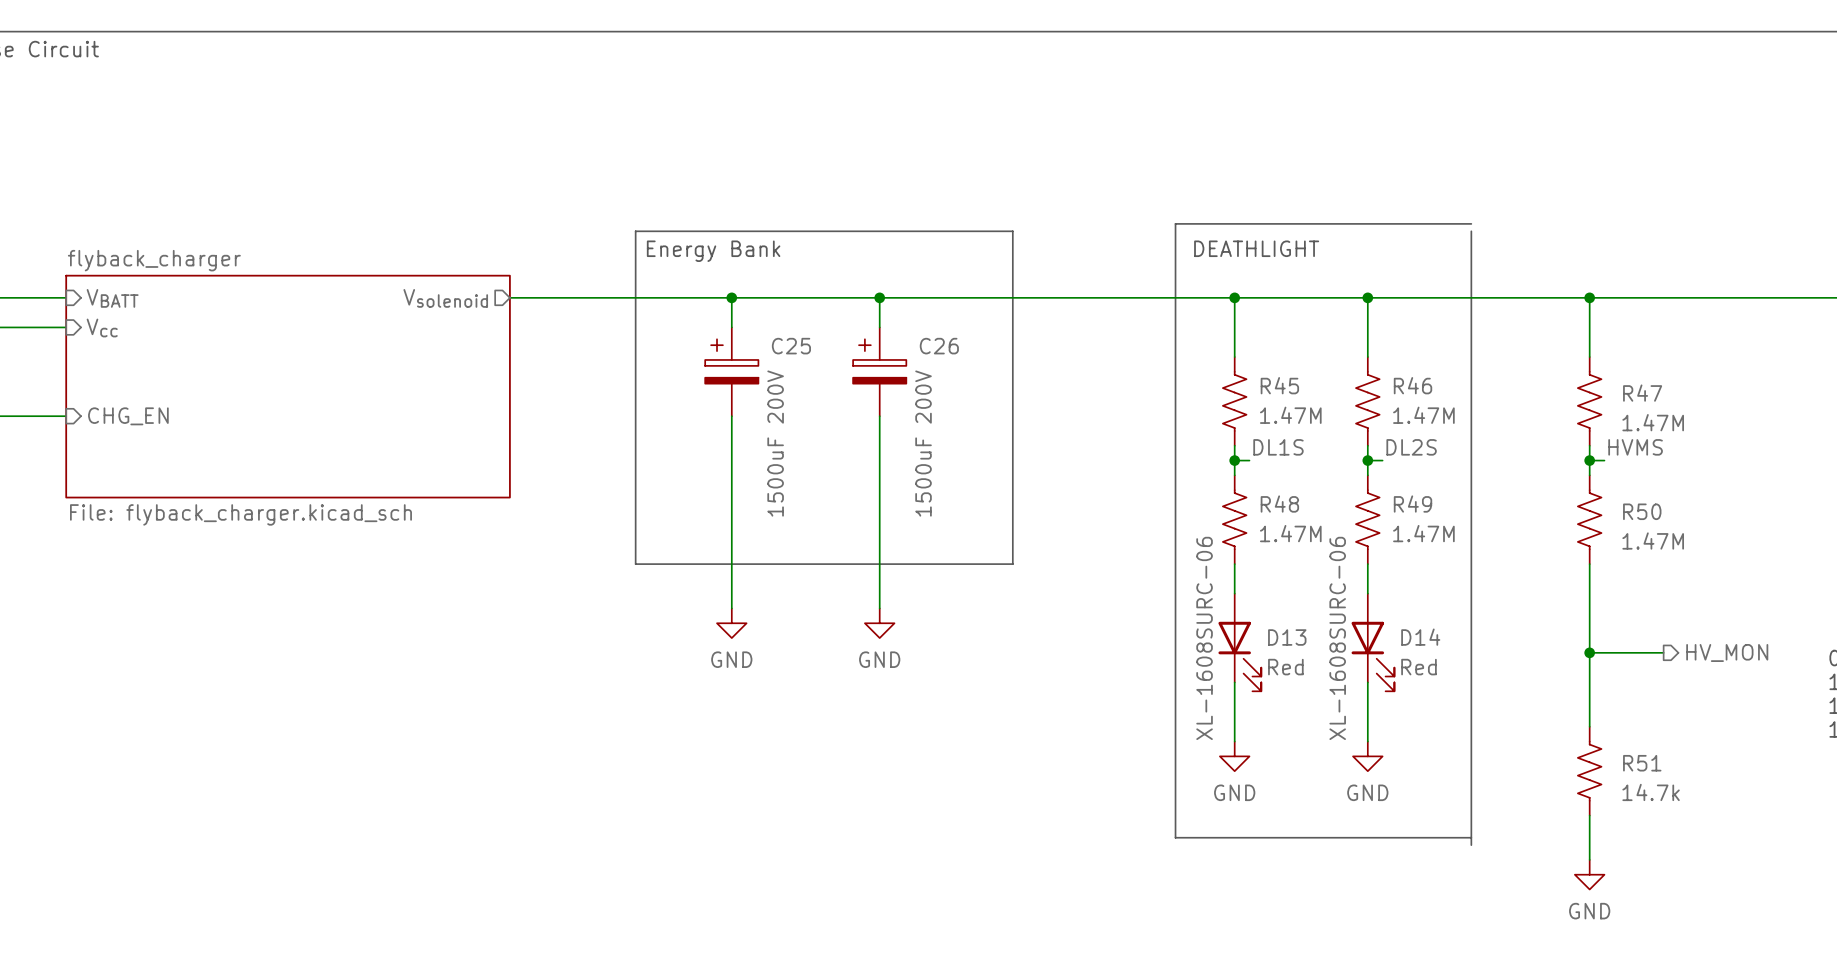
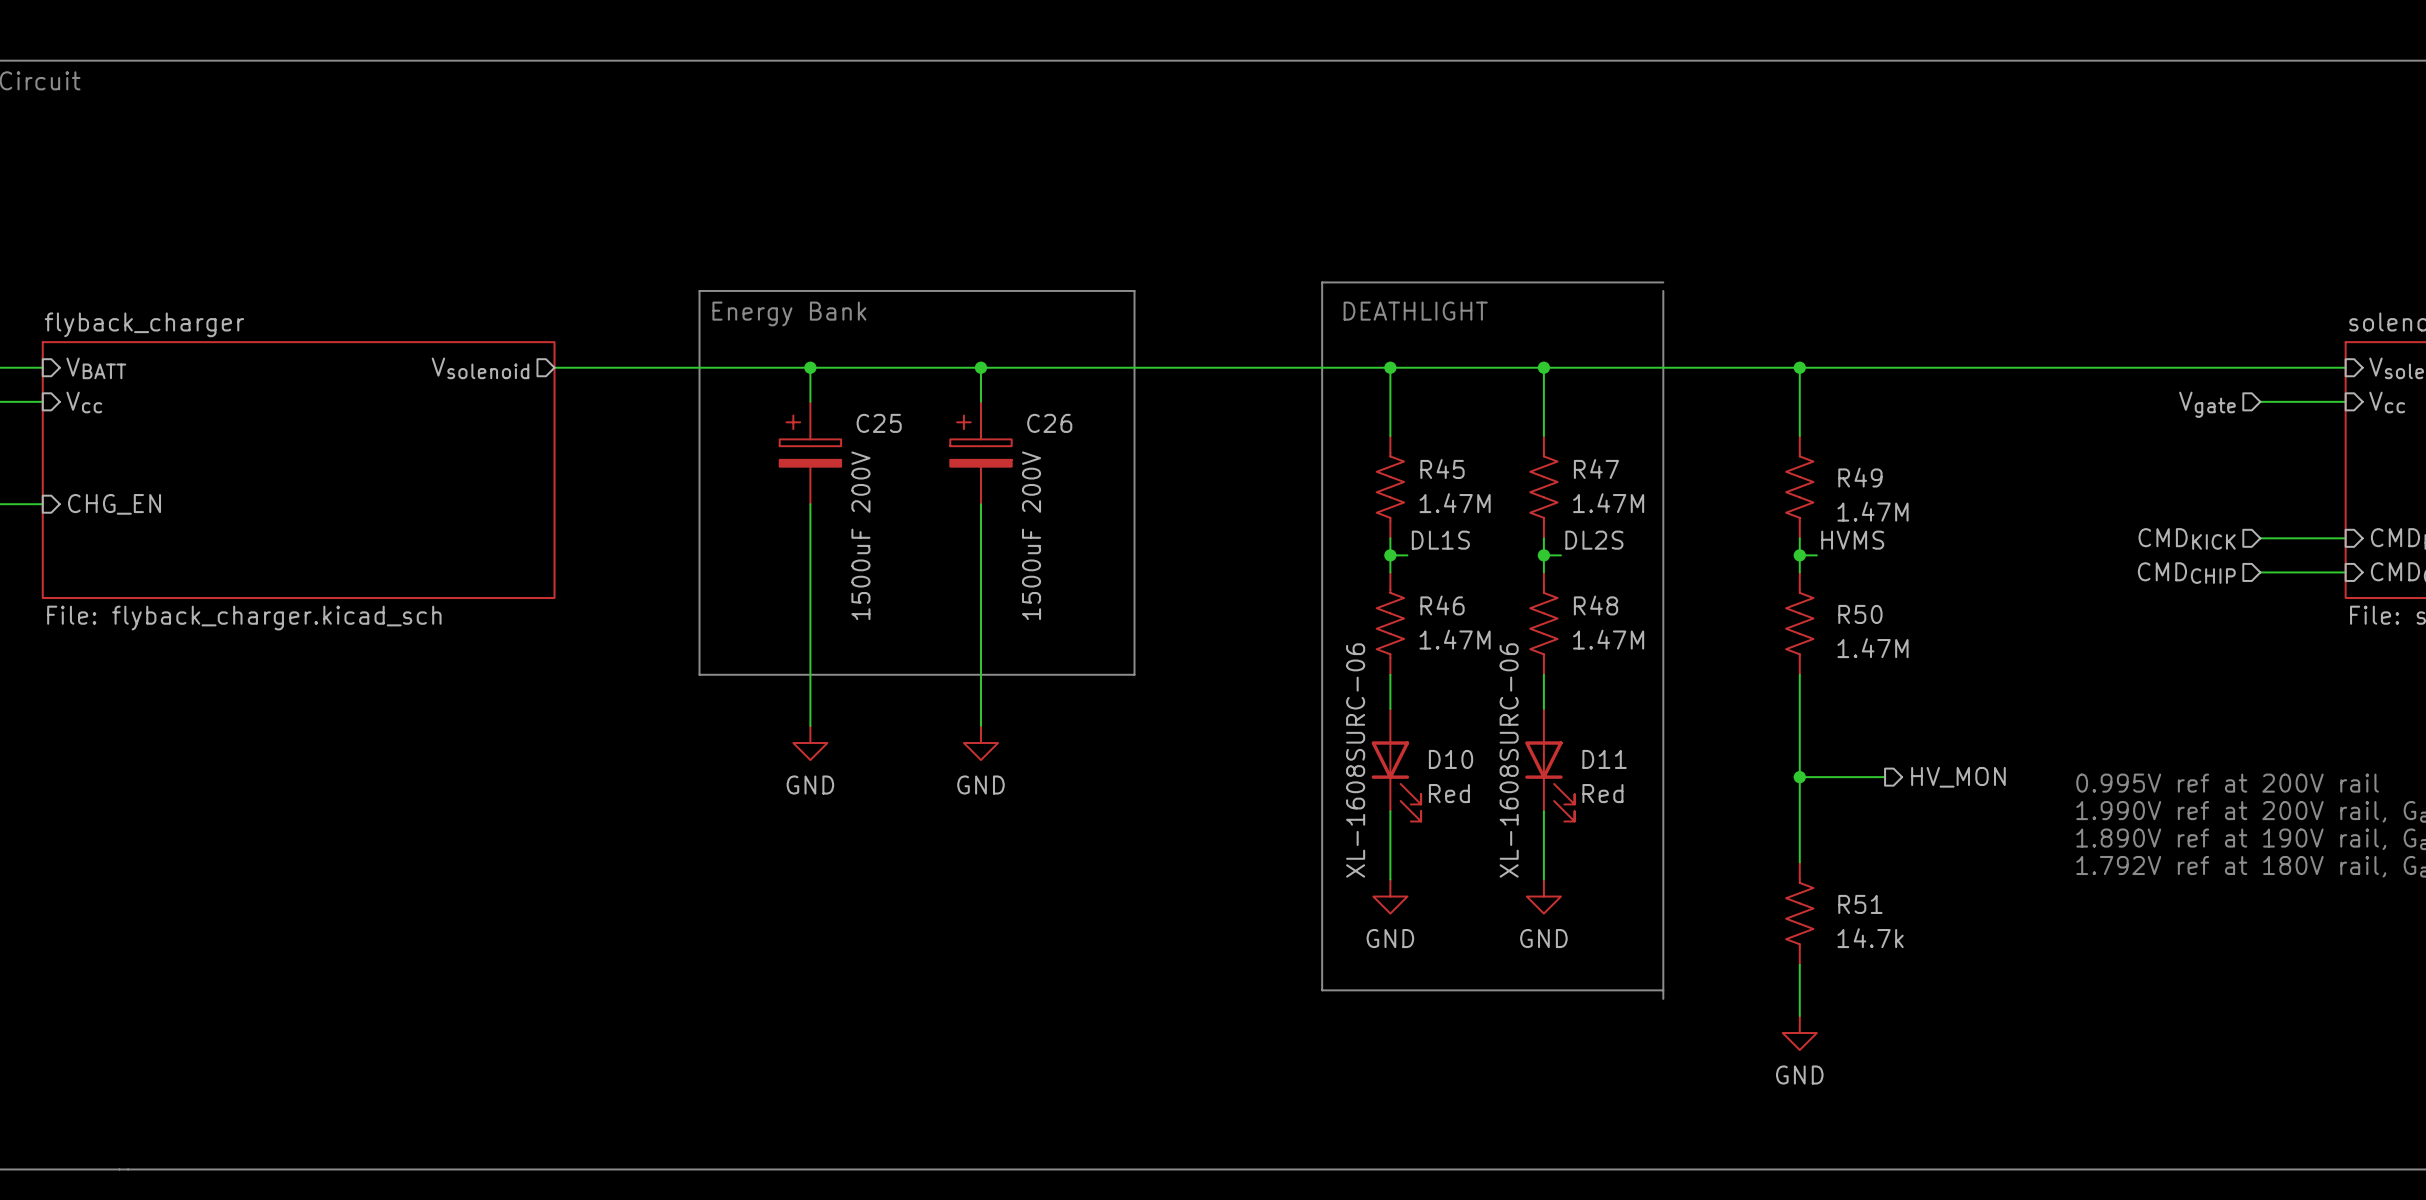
R46 name: R46 (1413, 385) -> R47 (1596, 469)
R47 name: R47 (1642, 393) -> R49 (1860, 477)
R48 name: R48 (1279, 504) -> R46 (1442, 605)
R49 name: R49 (1413, 504) -> R48 (1596, 605)
D13 name: D13 (1287, 637) -> D10 (1451, 759)
D14 name: D14 (1420, 637) -> D11 (1604, 759)

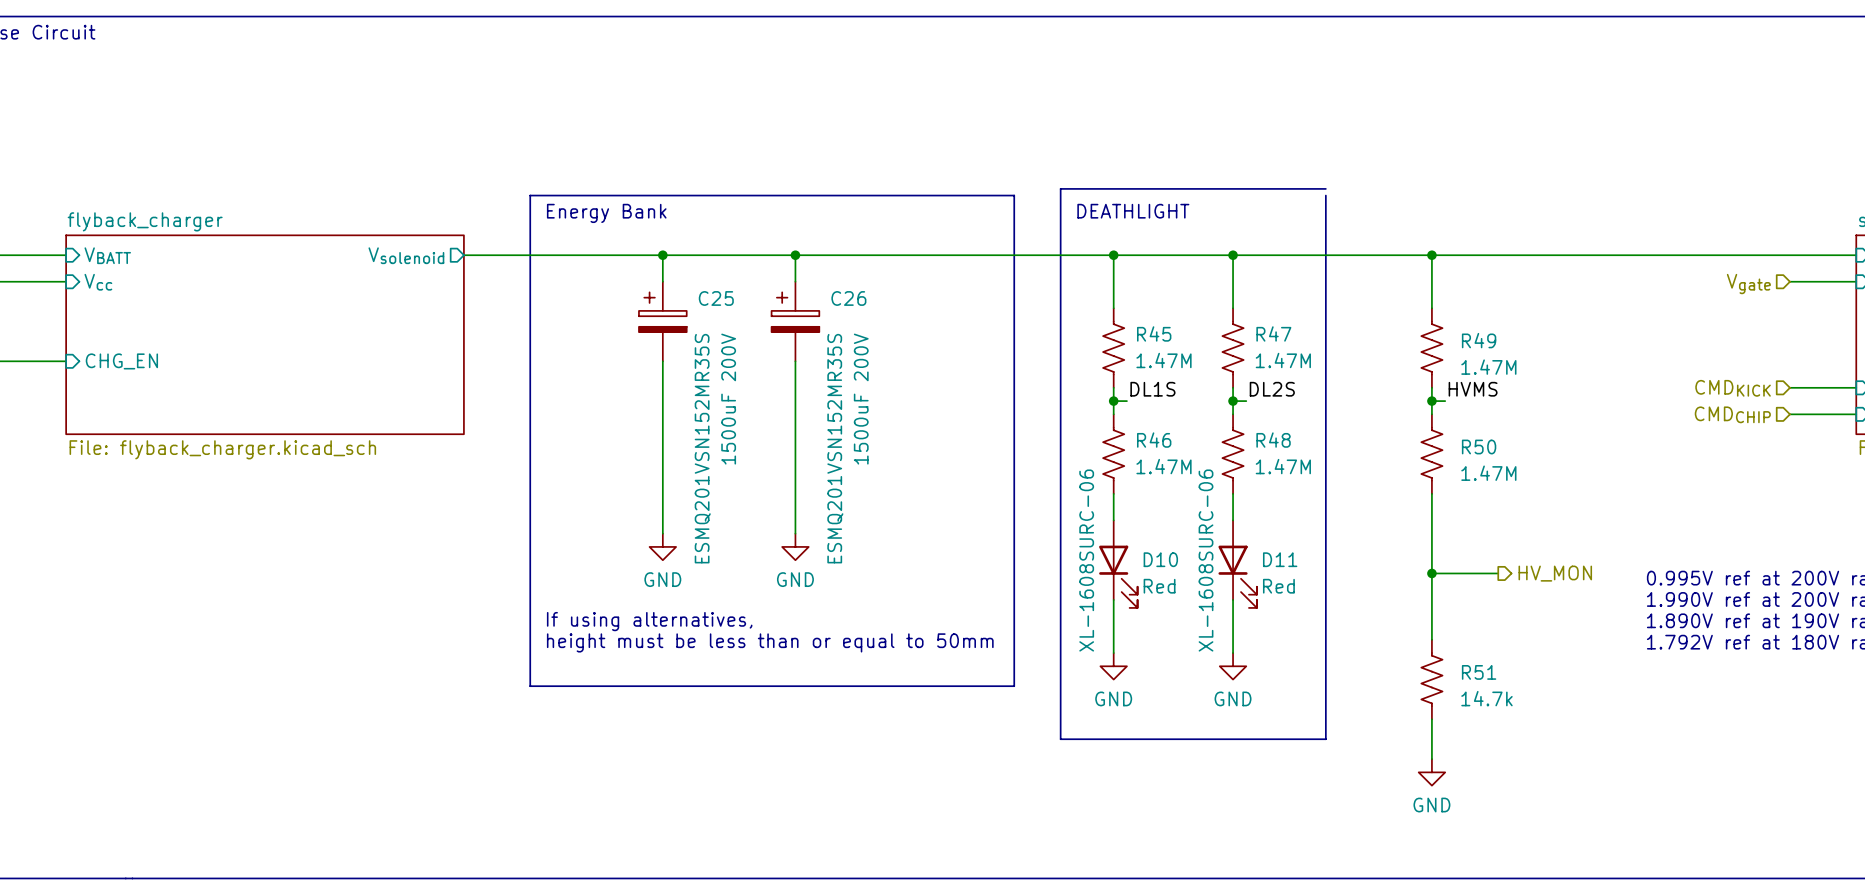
line: (699, 290) (699, 674) (1134, 674) (1134, 290) -> (576, 195) (530, 195) (530, 686) (1014, 686) (1014, 195) (914, 195)
text position: Energy Bank (789, 313) -> Energy Bank (606, 213)
C25 value: 1500uF 200V (860, 535) -> ESMQ201VSN152MR35S (702, 448)
C26 value: 1500uF 200V (1031, 535) -> ESMQ201VSN152MR35S (835, 448)
C25 text: none -> 1500uF 200V (728, 399)
C26 text: none -> 1500uF 200V (861, 399)
text: none -> If using alternatives, (649, 621)
text: none -> height must be less than or equal to 50mm (770, 642)
line: (1663, 990) (1663, 998) -> none

